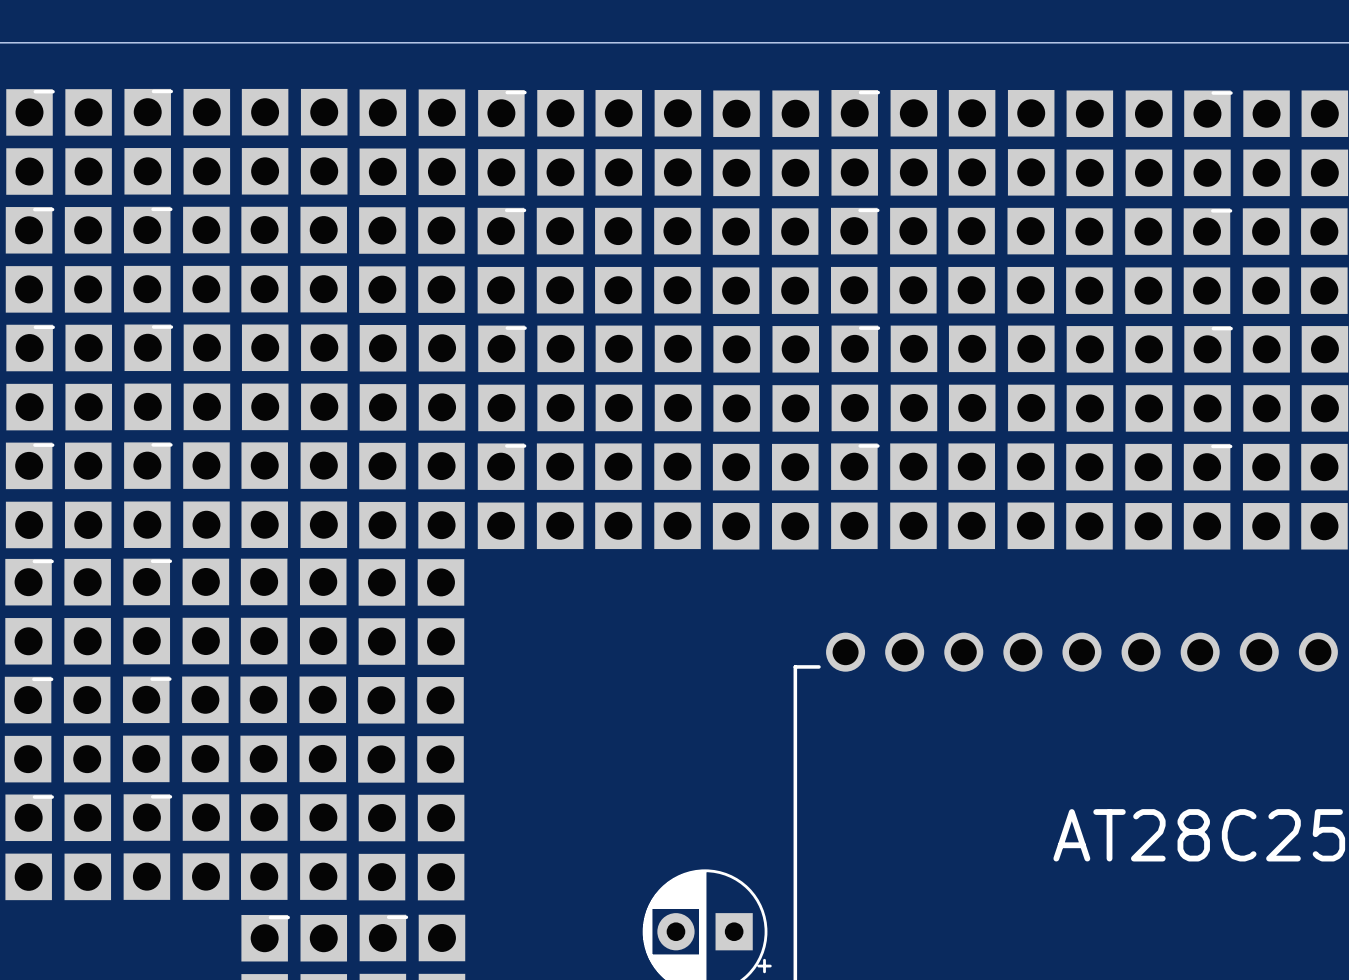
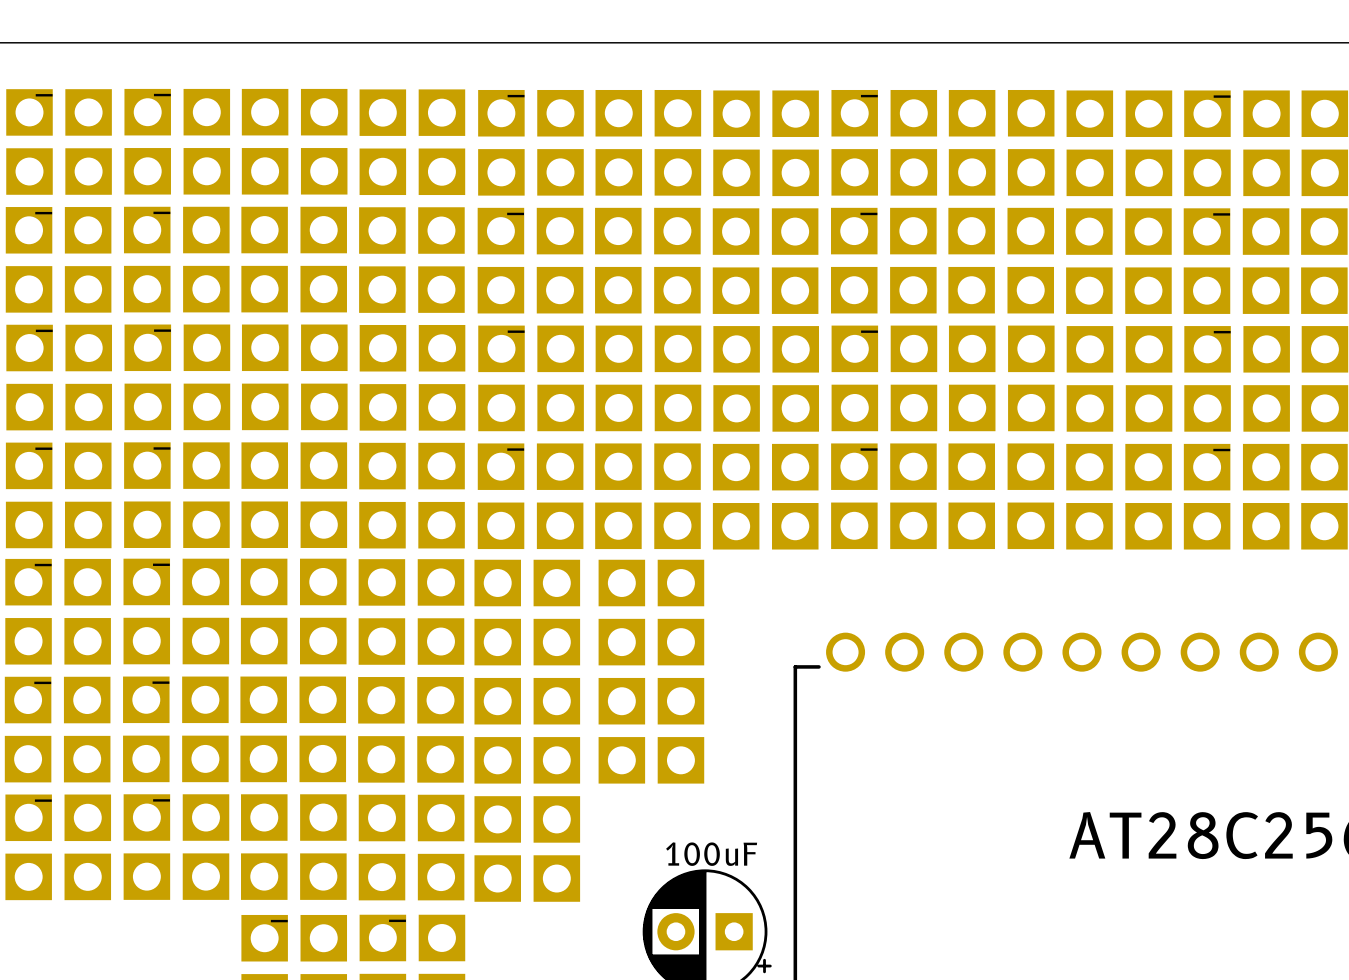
part: none -> (527, 612)
part: none -> (651, 612)
part: none -> (527, 730)
part: none -> (651, 730)
part: none -> (527, 848)
part value: none -> 100uF (711, 854)

